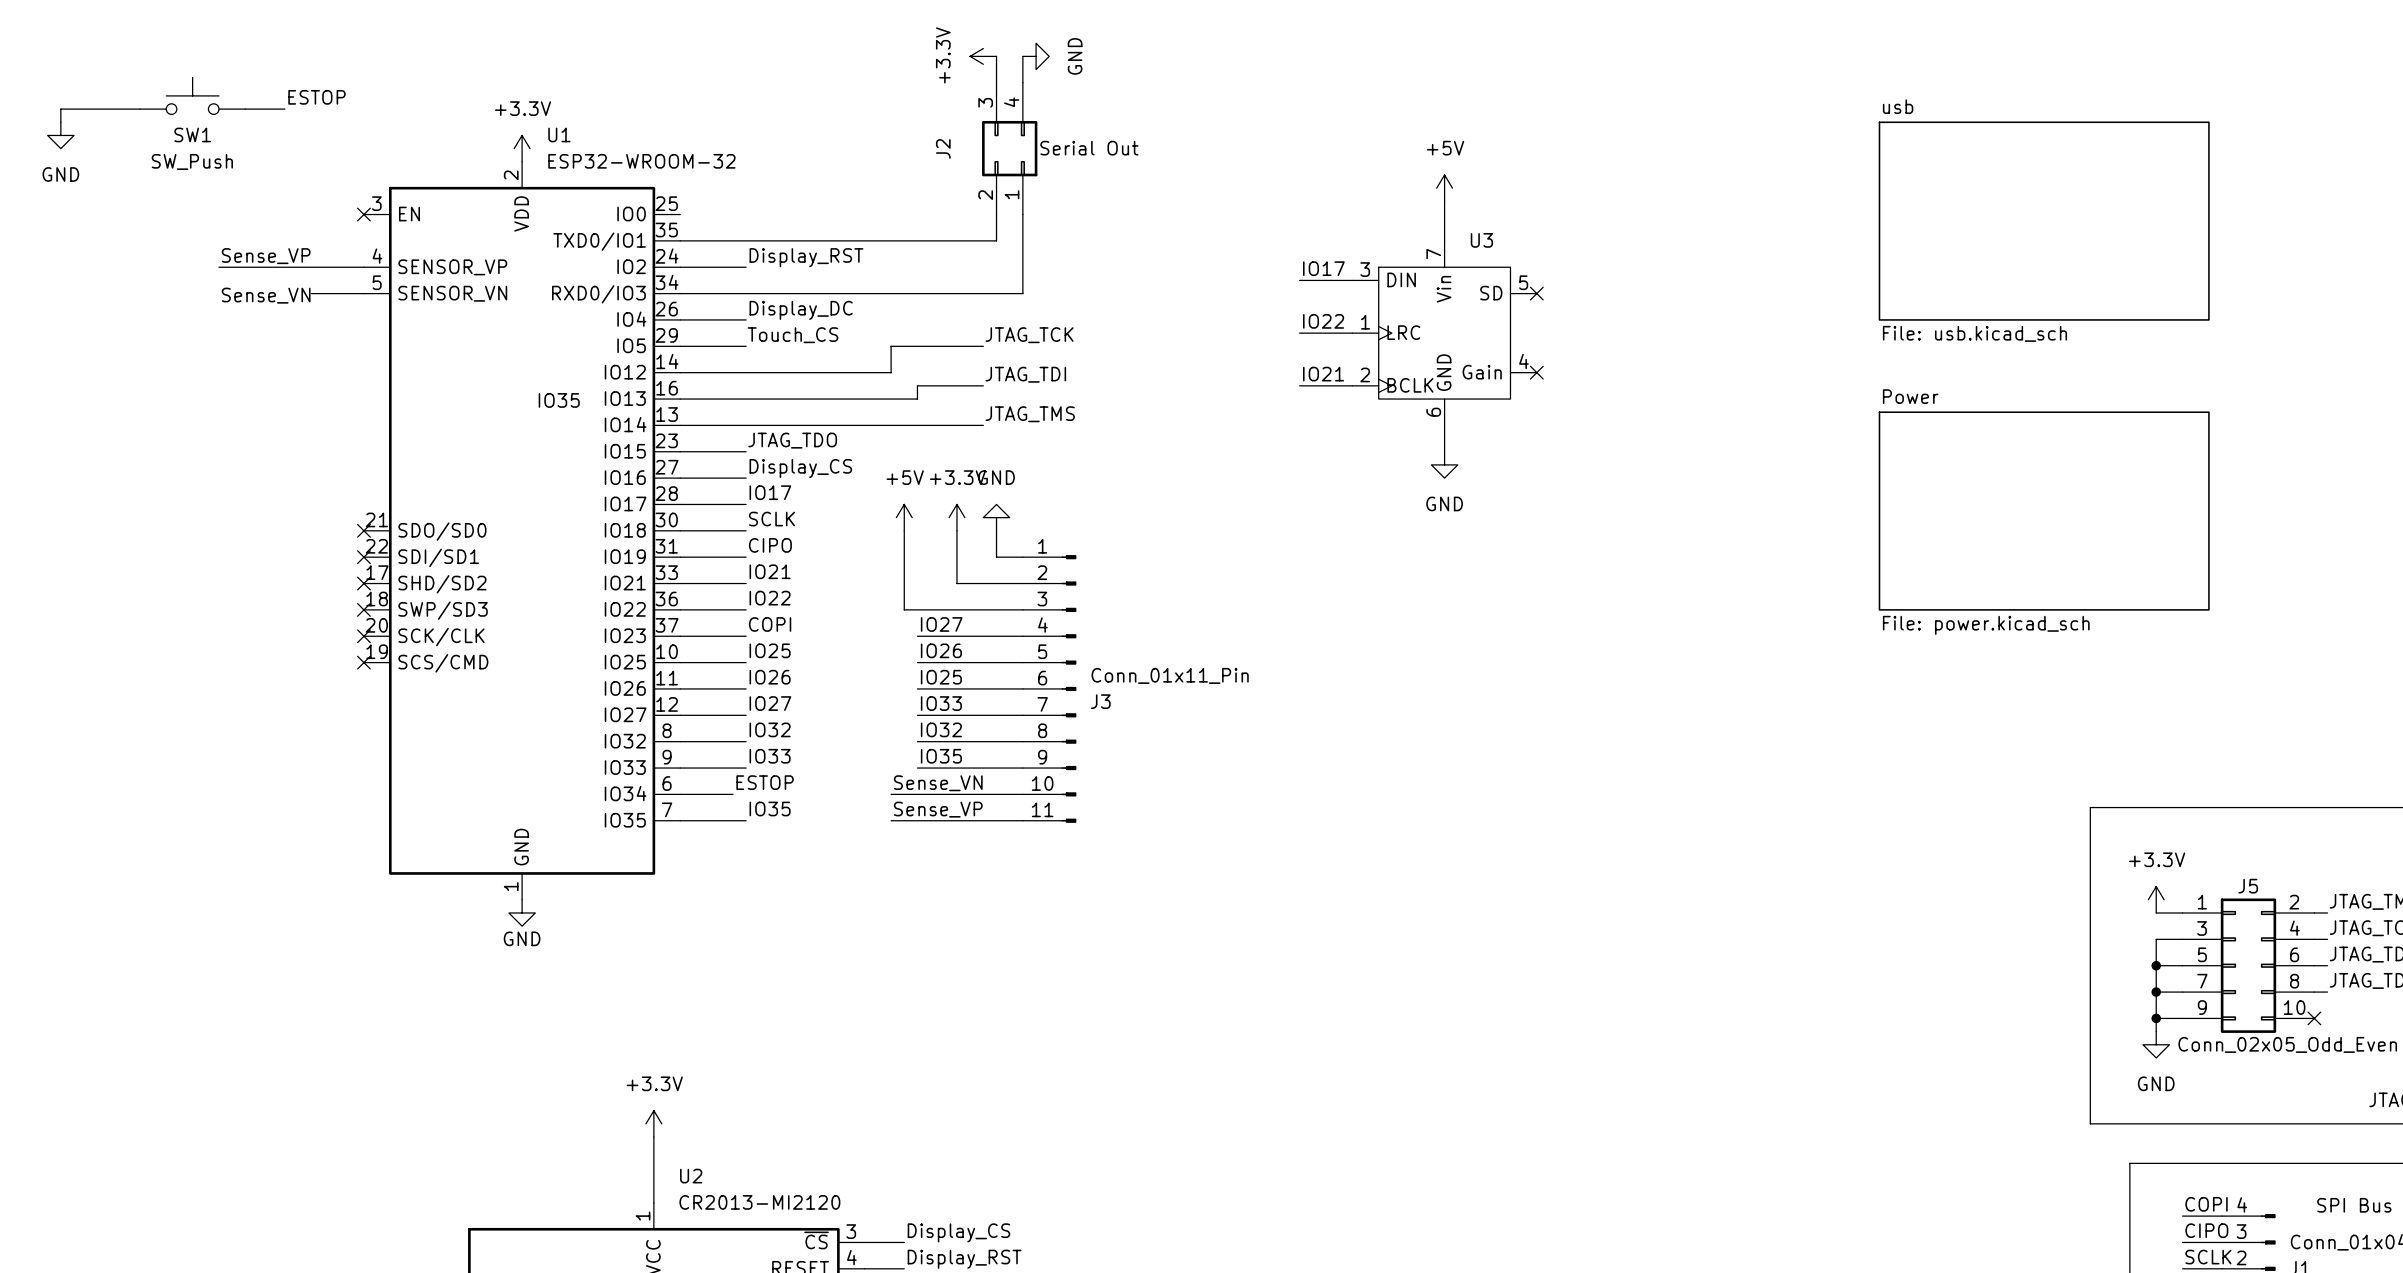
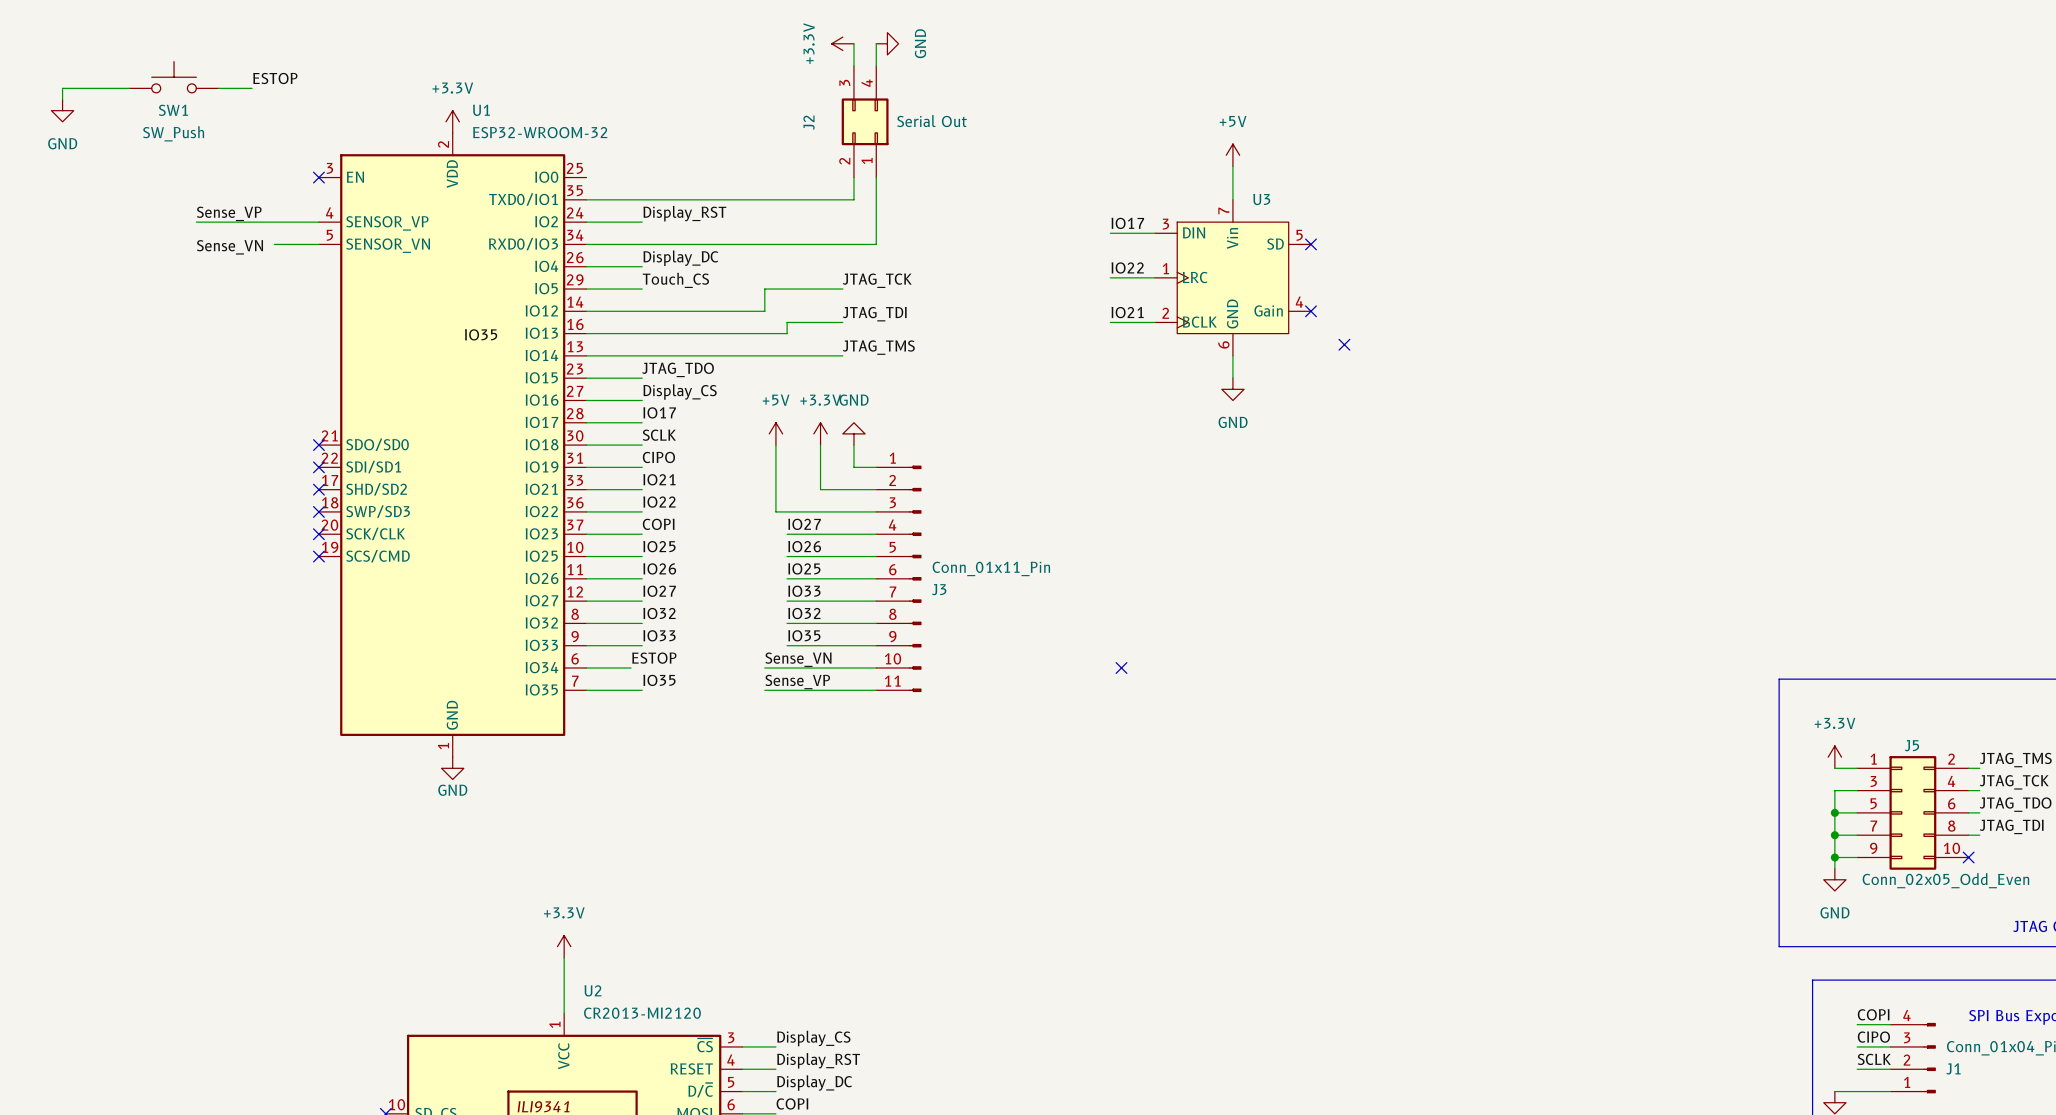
sheet usb: File: usb.kicad_sch (2044, 221) -> none
no-connect mark: none -> (1344, 344)
sheet Power: File: power.kicad_sch (2044, 511) -> none
no-connect mark: none -> (1121, 667)

